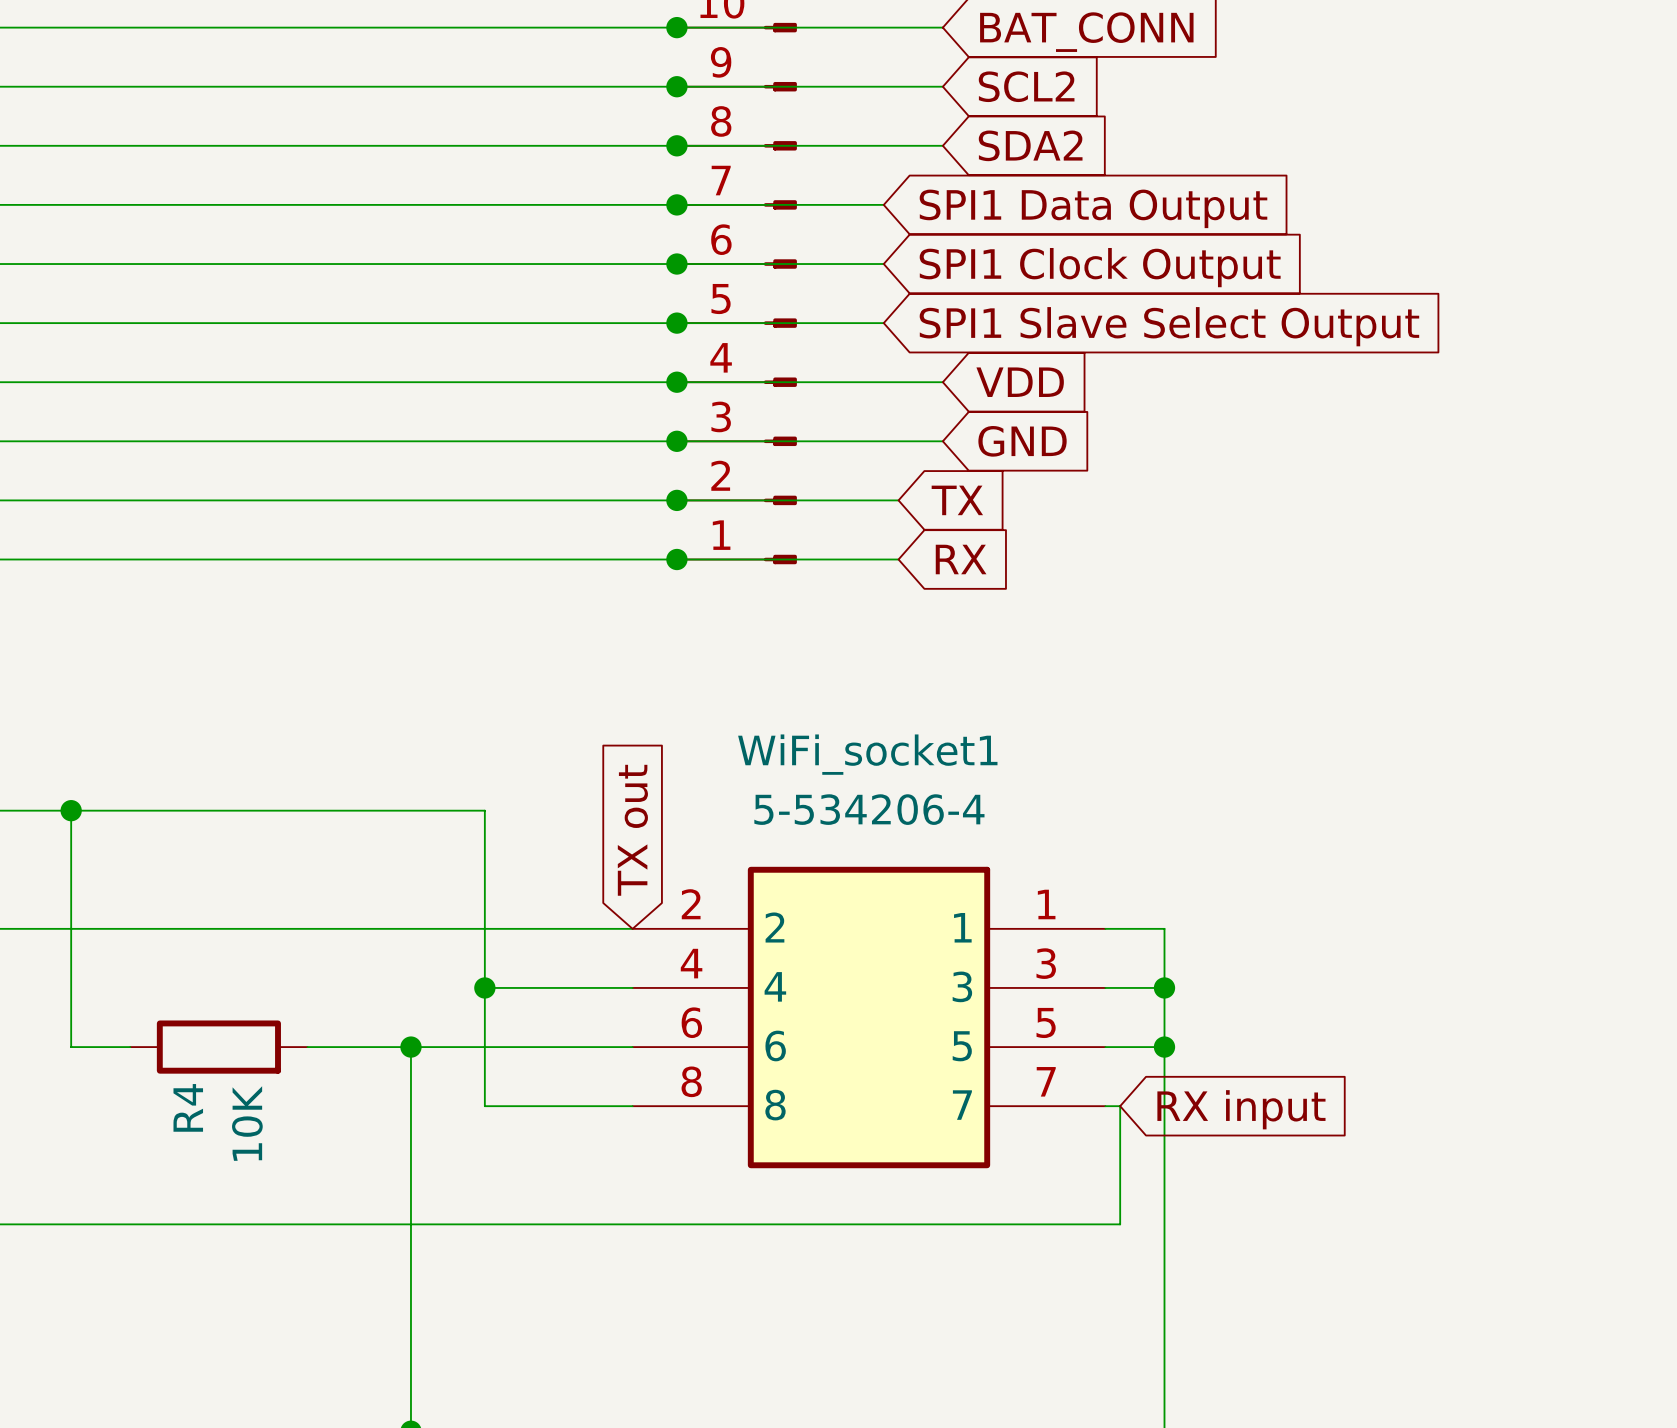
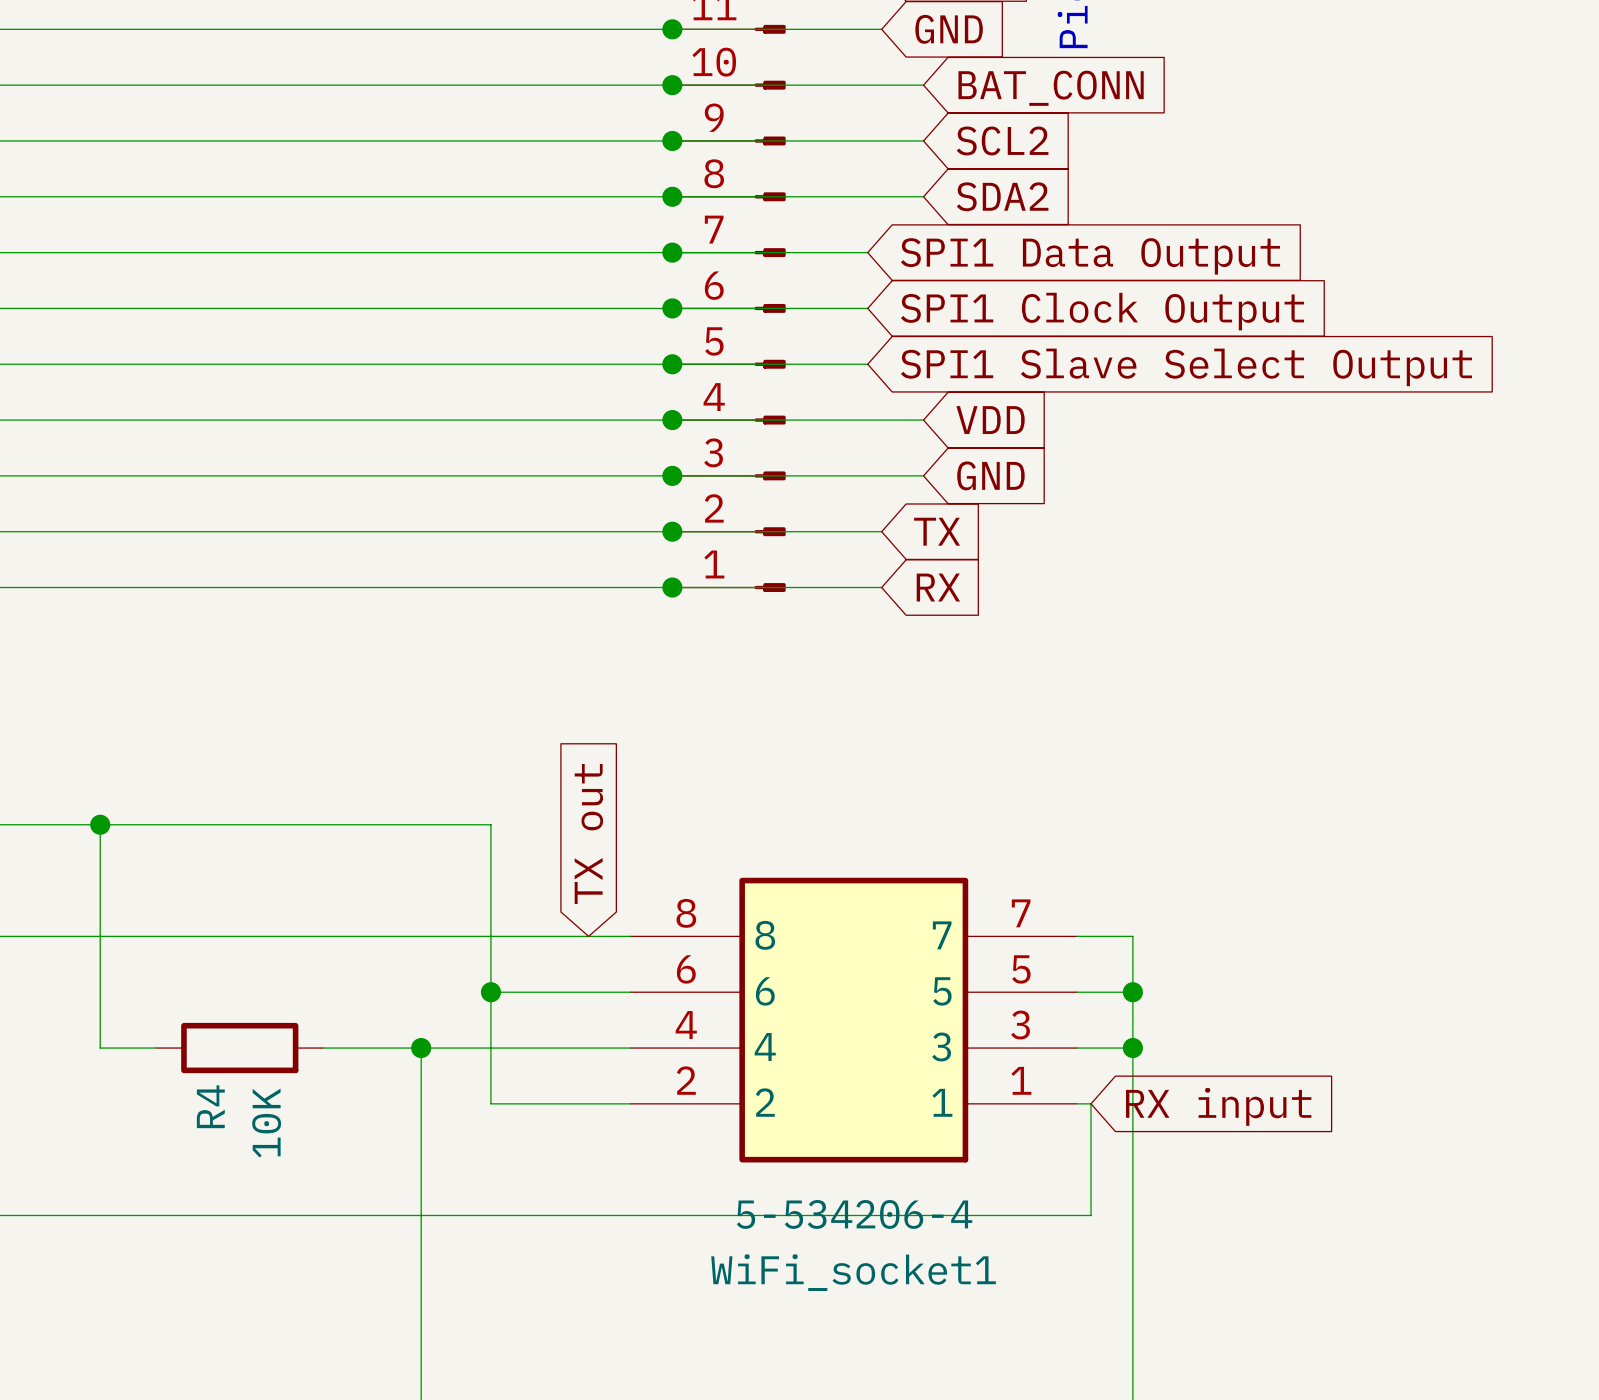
global label position: TX out (632, 830) -> TX out (588, 834)
WiFi_socket1 flip: as is (869, 1017) -> up-down (853, 1020)

